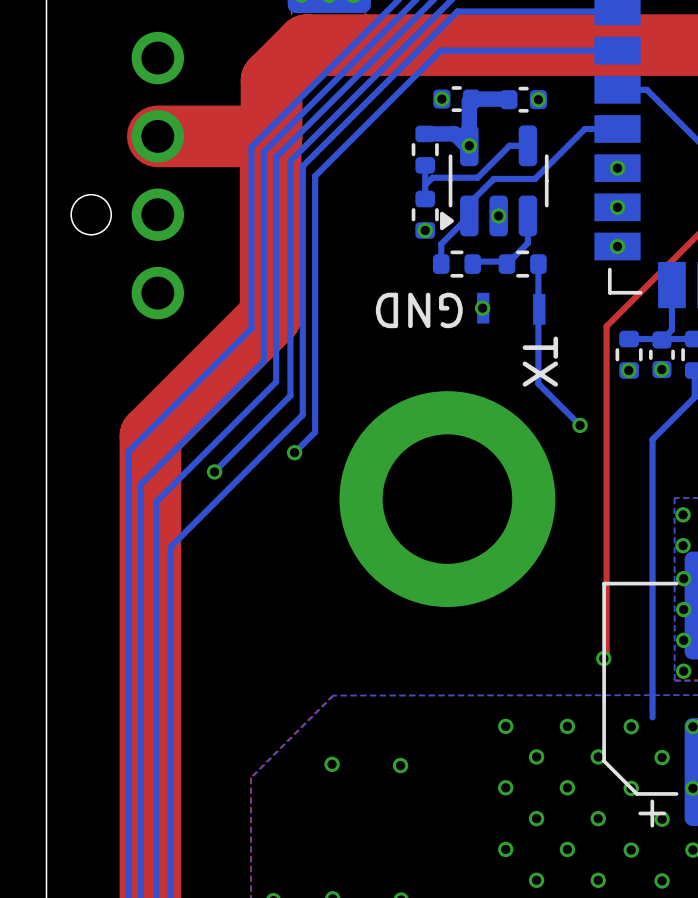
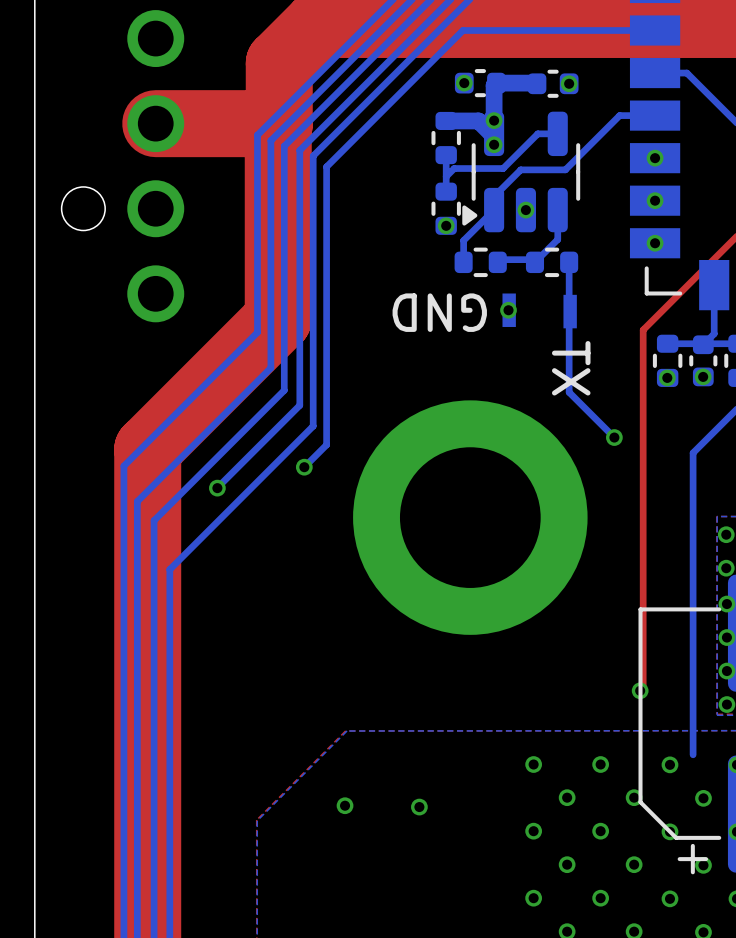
via: none -> (494, 120)
via: (469, 145) -> none
via: none -> (494, 144)

